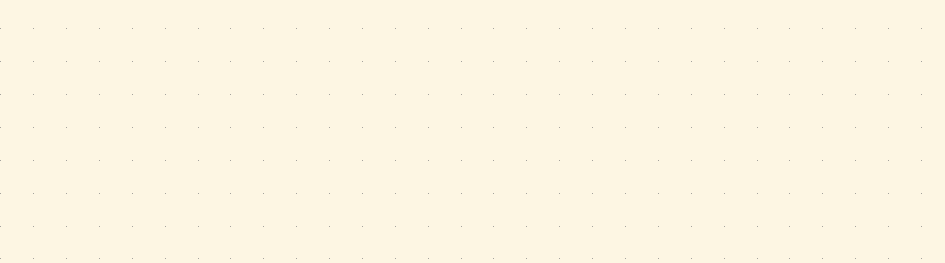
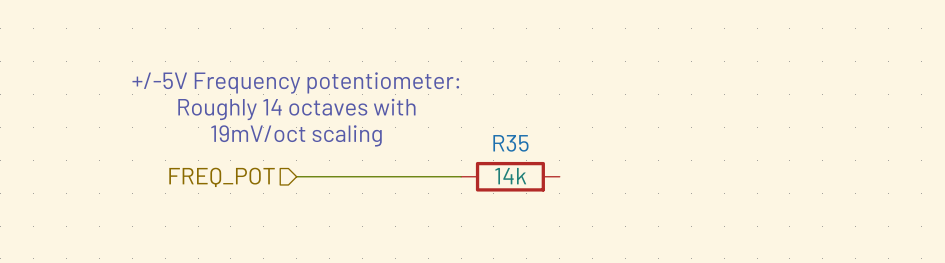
text: none -> +/-5V Frequency potentiometer: (295, 82)
text: none -> Roughly 14 octaves with (296, 109)
text: none -> 19mV/oct scaling (296, 135)
wire: none -> (296, 176) (461, 176)
R35: none -> 14k (510, 176)
hierarchical label: none -> FREQ_POT (222, 177)

